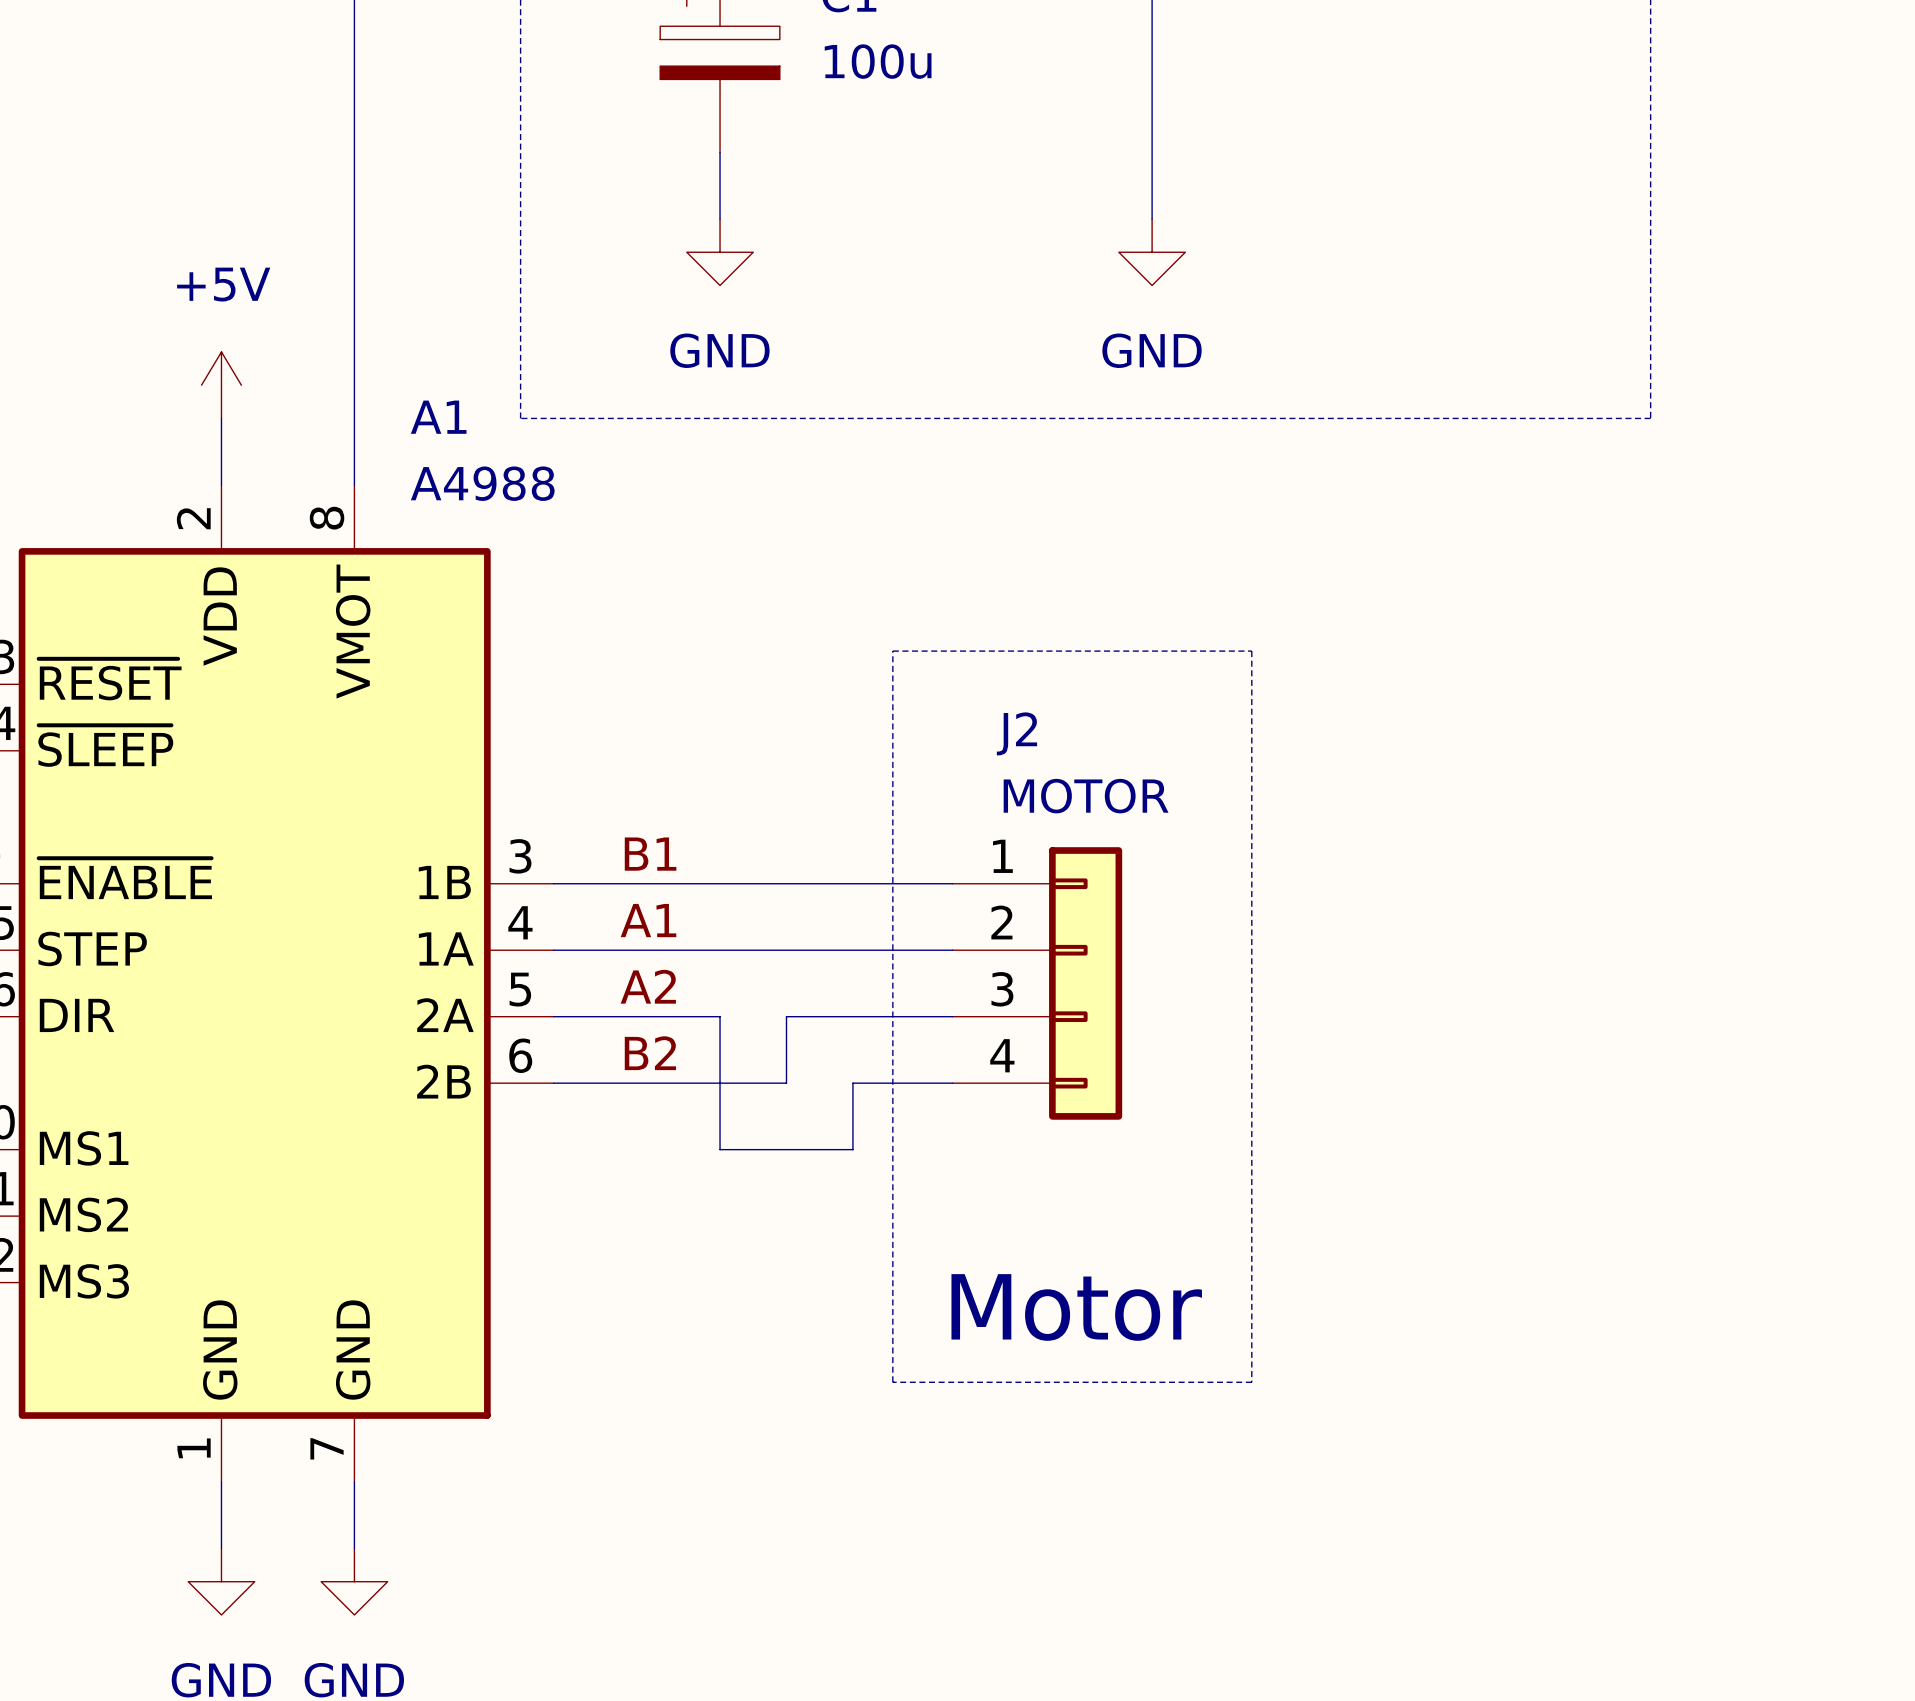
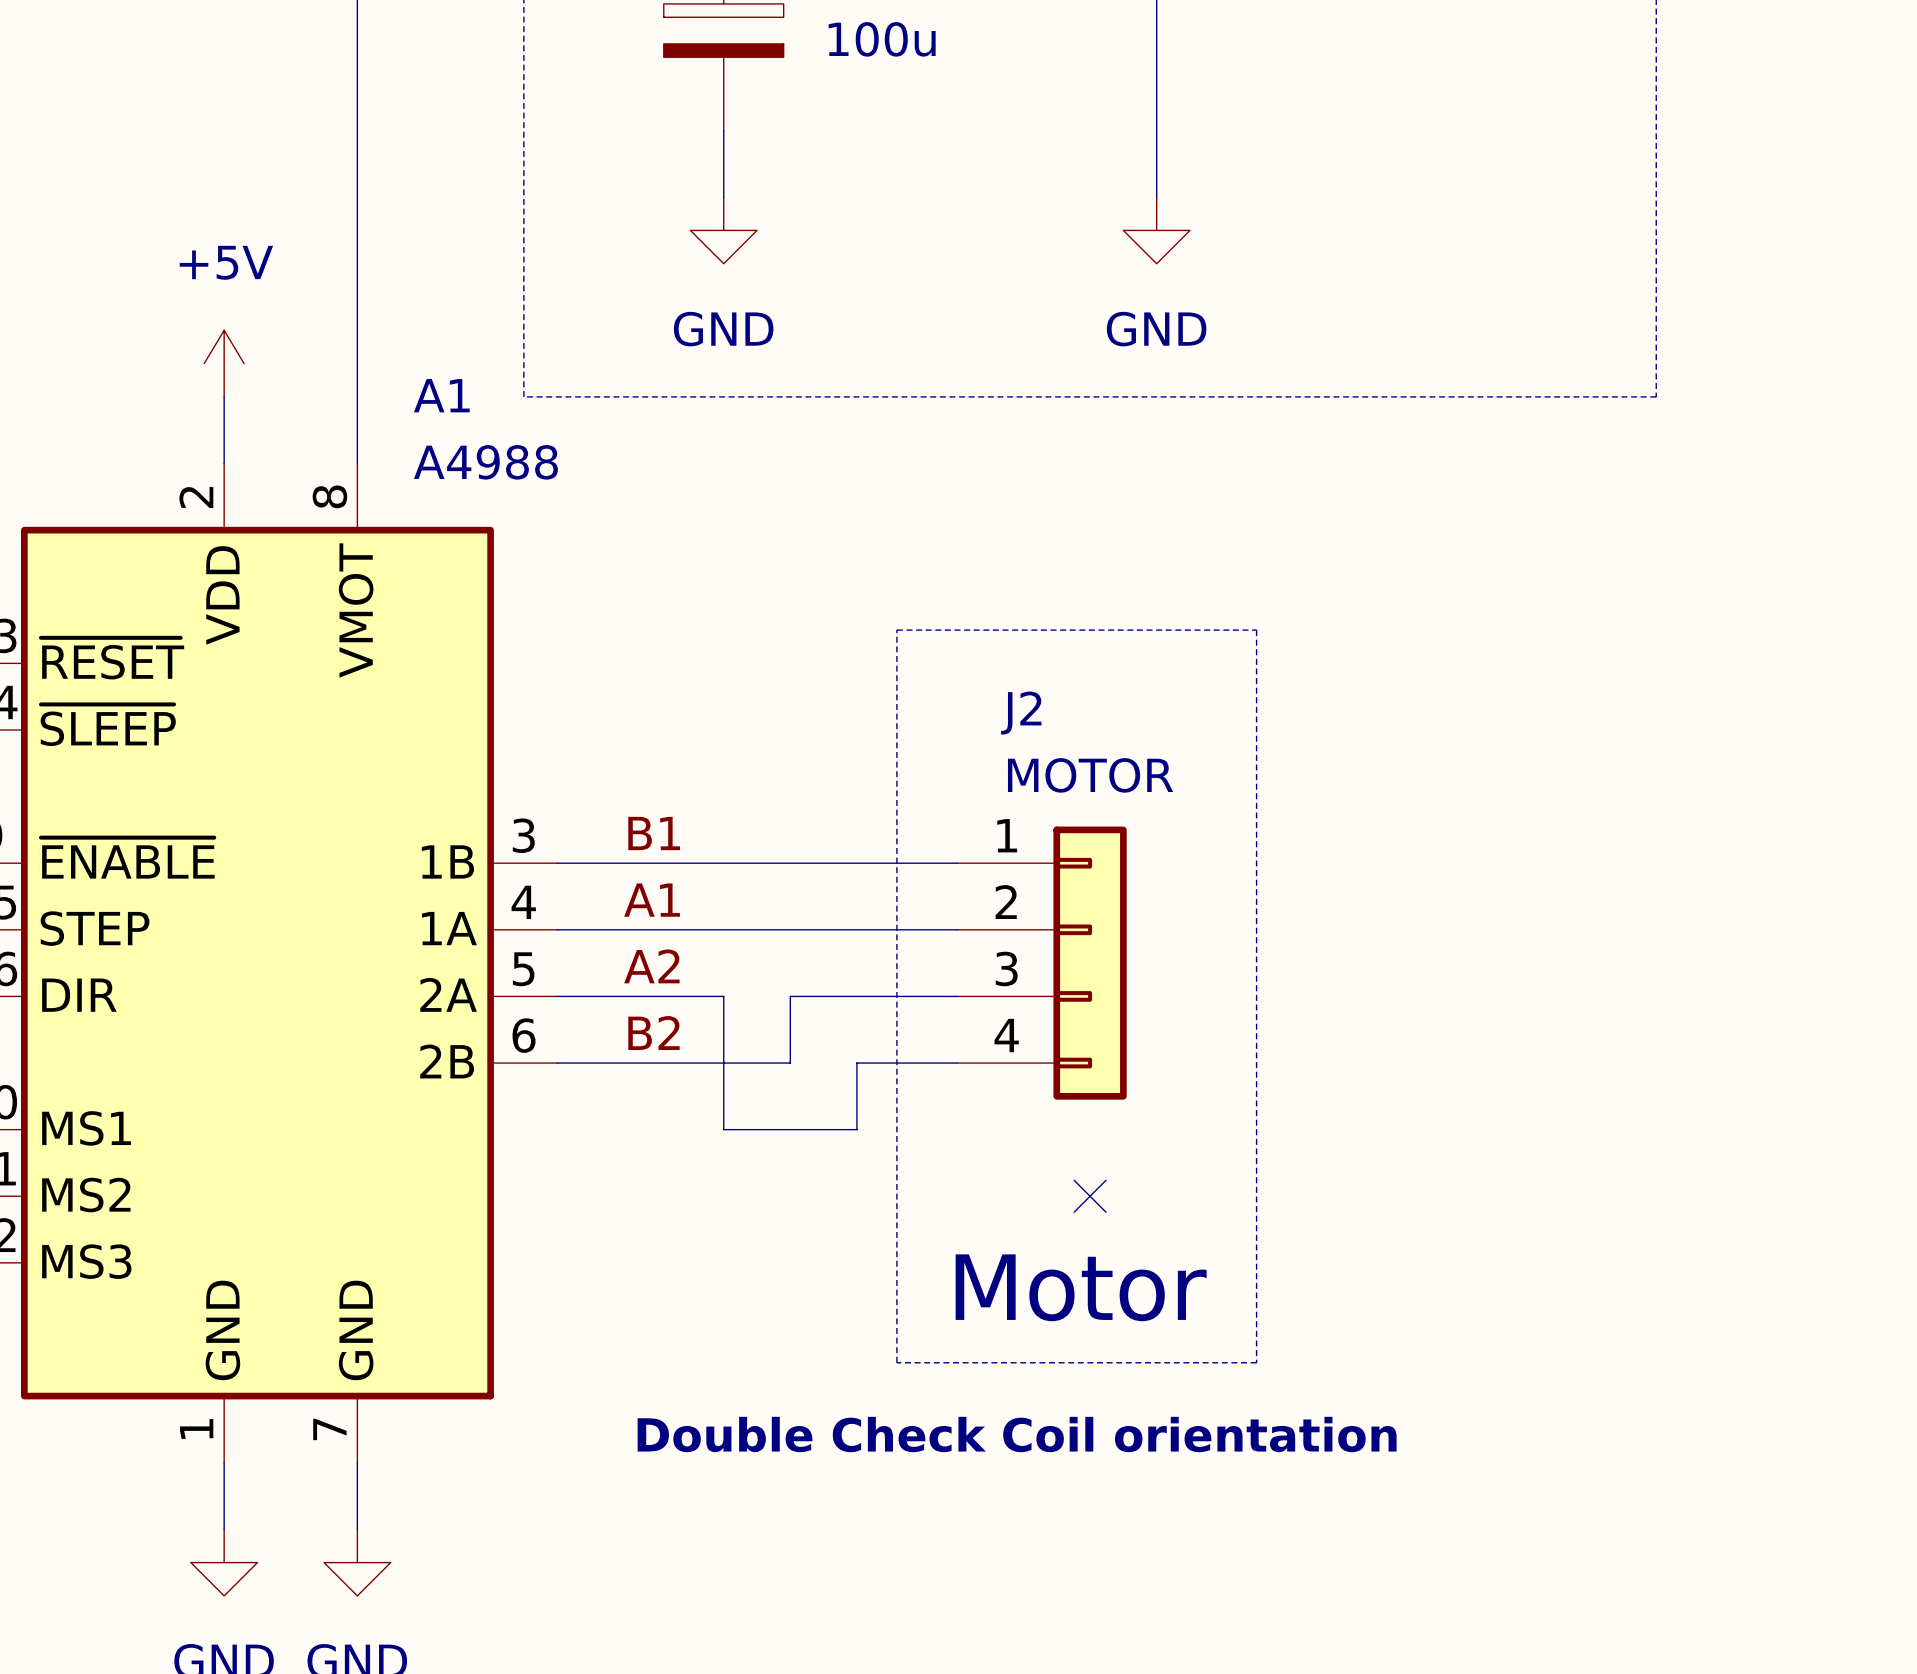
no-connect mark: none -> (1090, 1196)
text: none -> Double Check Coil orientation (1017, 1434)

